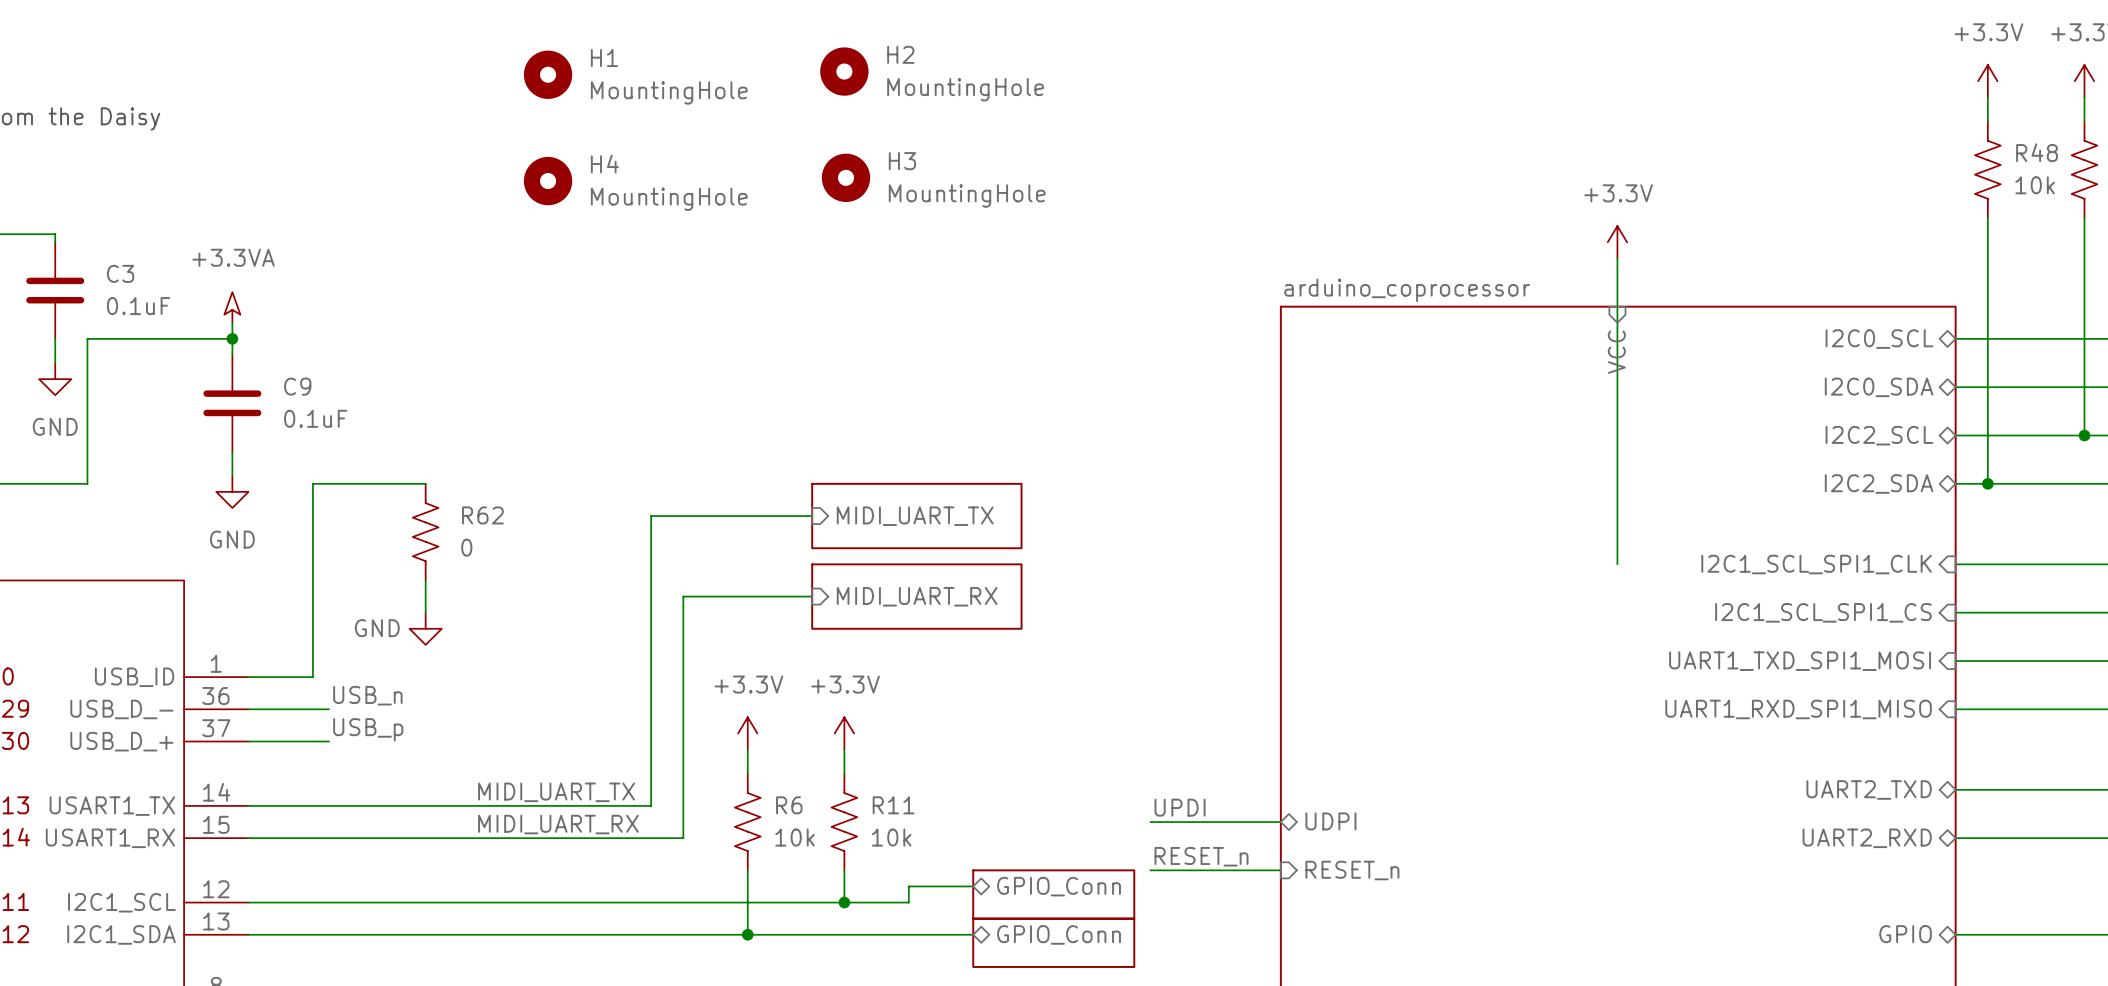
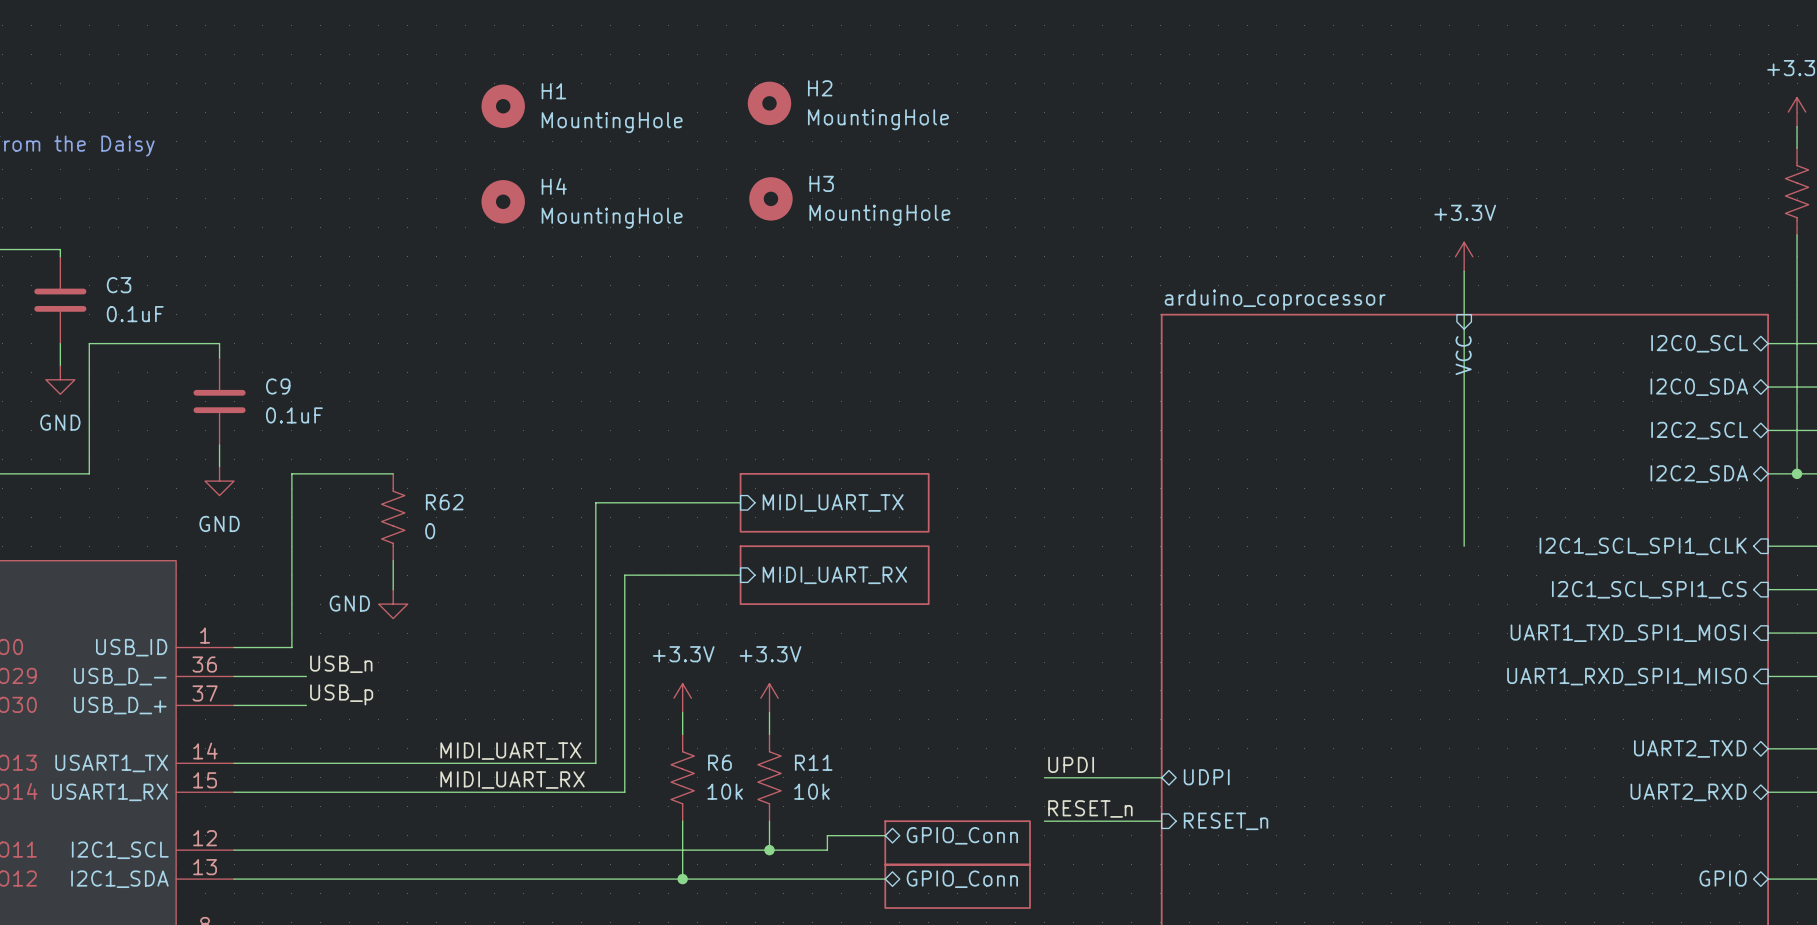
power symbol: +3.3VA (232, 307) -> none
wire: (232, 322) (232, 338) -> none
junction: (232, 338) -> none

